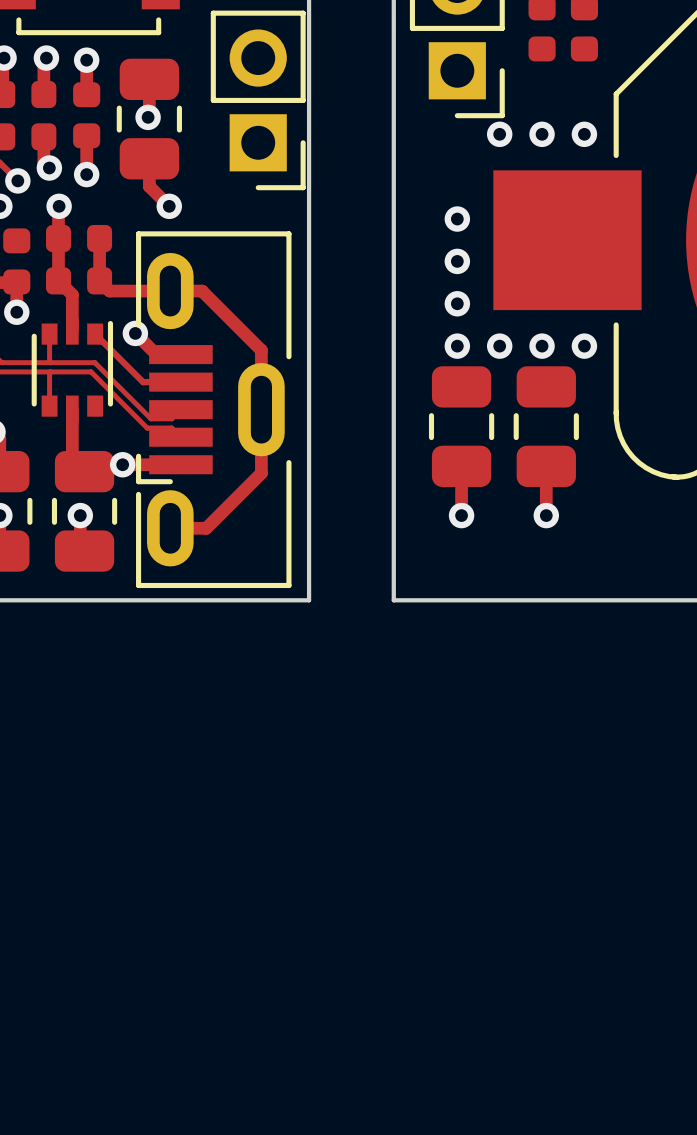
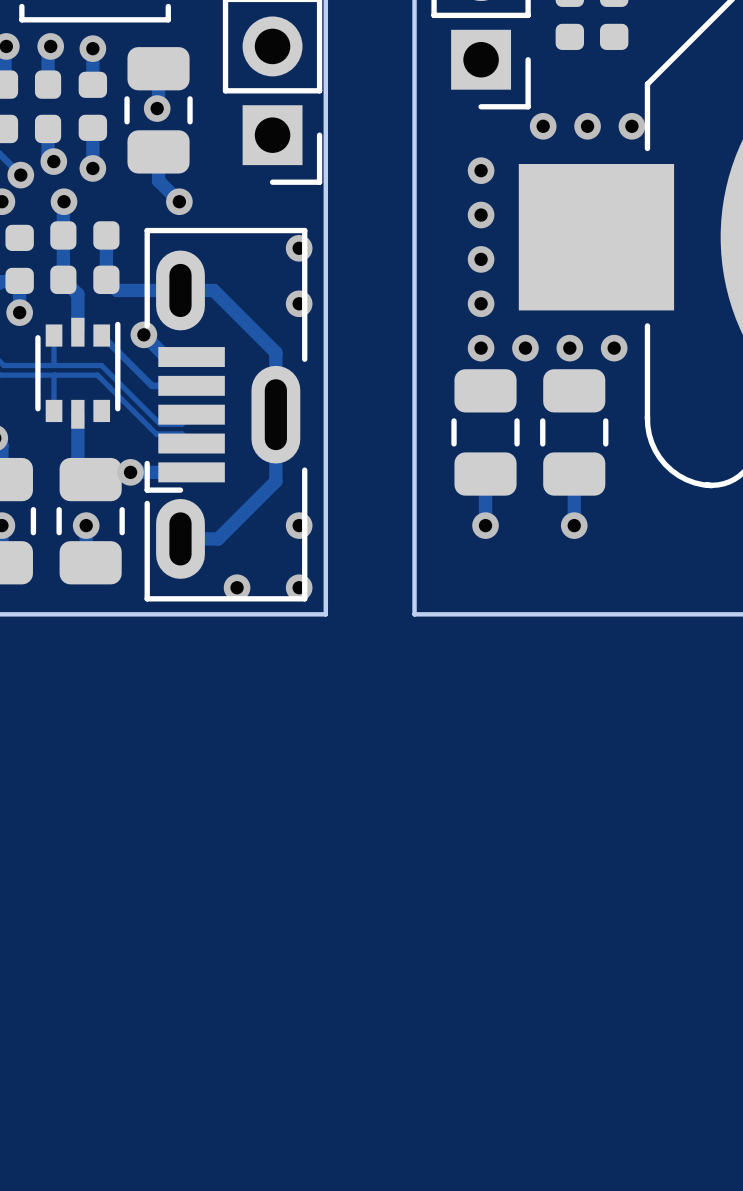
via: (499, 134) -> none
via: none -> (543, 126)
via: (542, 134) -> none
via: none -> (587, 126)
via: (584, 134) -> none
via: none -> (631, 126)
via: none -> (481, 170)
via: none -> (299, 248)
via: none -> (299, 303)
via: none -> (299, 525)
via: none -> (237, 587)
via: none -> (299, 587)

